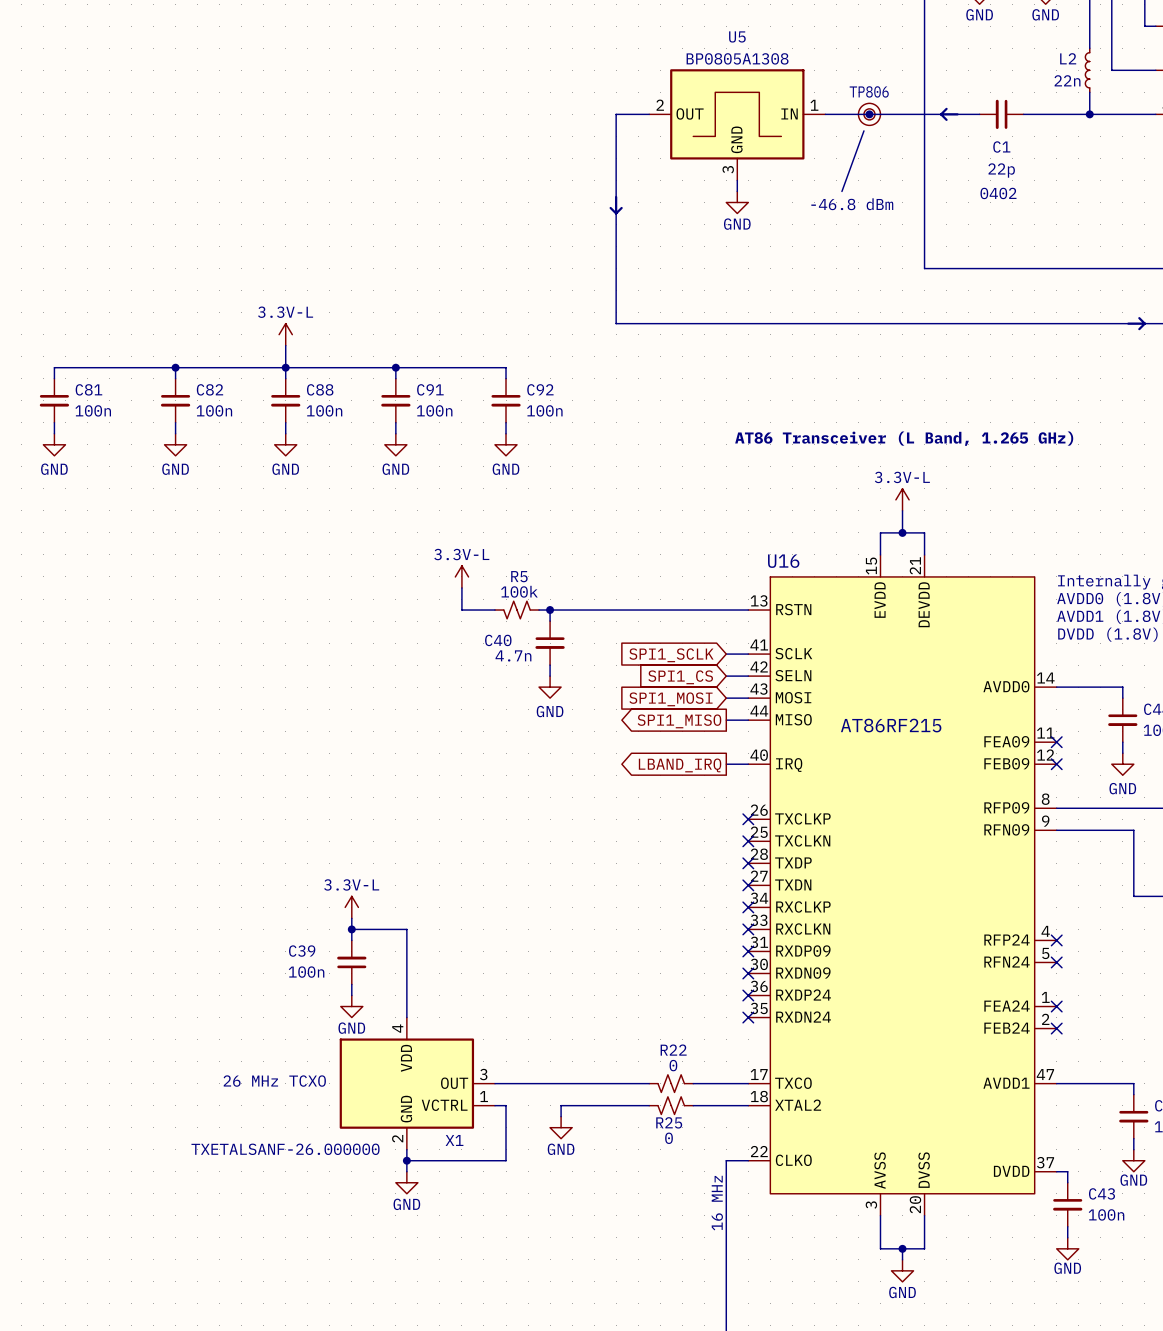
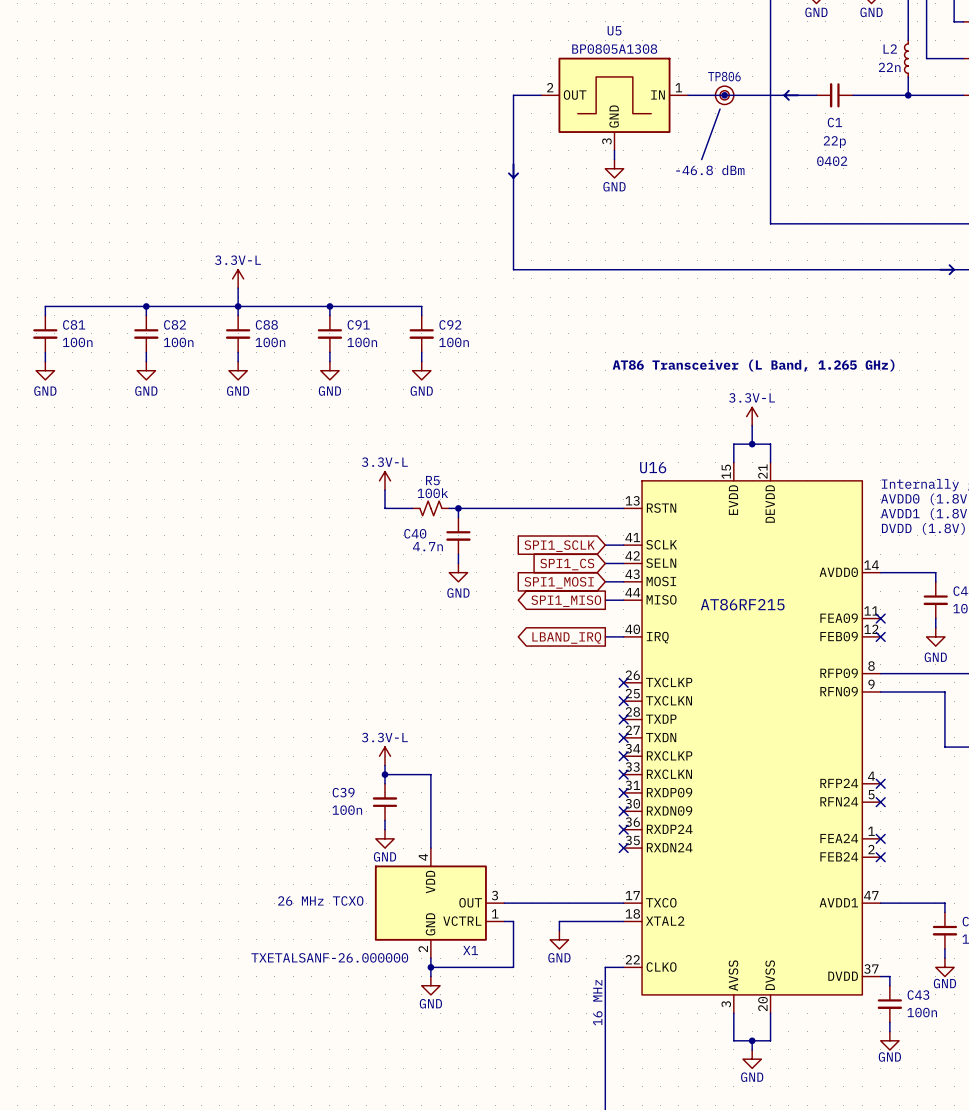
power symbol position: 3.3V-L (351, 907) -> 3.3V-L (385, 756)
wire: (351, 918) (351, 940) -> (385, 765) (385, 783)
wire: (351, 929) (406, 929) (406, 1017) -> (385, 774) (430, 774) (430, 848)
junction: (351, 929) -> none
junction: none -> (385, 774)
C39 position: (351, 962) -> (385, 802)
wire: (351, 984) (351, 995) -> (385, 820) (385, 829)
power symbol: GND (351, 1006) -> none
power symbol: none -> GND (385, 838)
text position: 26 MHz TCXO (274, 1081) -> 26 MHz TCXO (320, 900)
X1 position: (417, 1083) -> (439, 903)
R22: 0 (671, 1083) -> none
wire: (494, 1105) (506, 1105) (506, 1160) (406, 1160) -> none
wire: (616, 1105) (649, 1105) -> (513, 921) (513, 967) (430, 967)
R25: 0 (671, 1105) -> none
wire: none -> (577, 921) (559, 921) (559, 930)
power symbol: GND (561, 1127) -> none
power symbol: none -> GND (559, 939)
wire: (406, 1149) (406, 1171) -> (430, 958) (430, 976)
junction: (406, 1160) -> none
junction: none -> (430, 967)
power symbol: GND (406, 1182) -> none
power symbol: none -> GND (430, 985)

